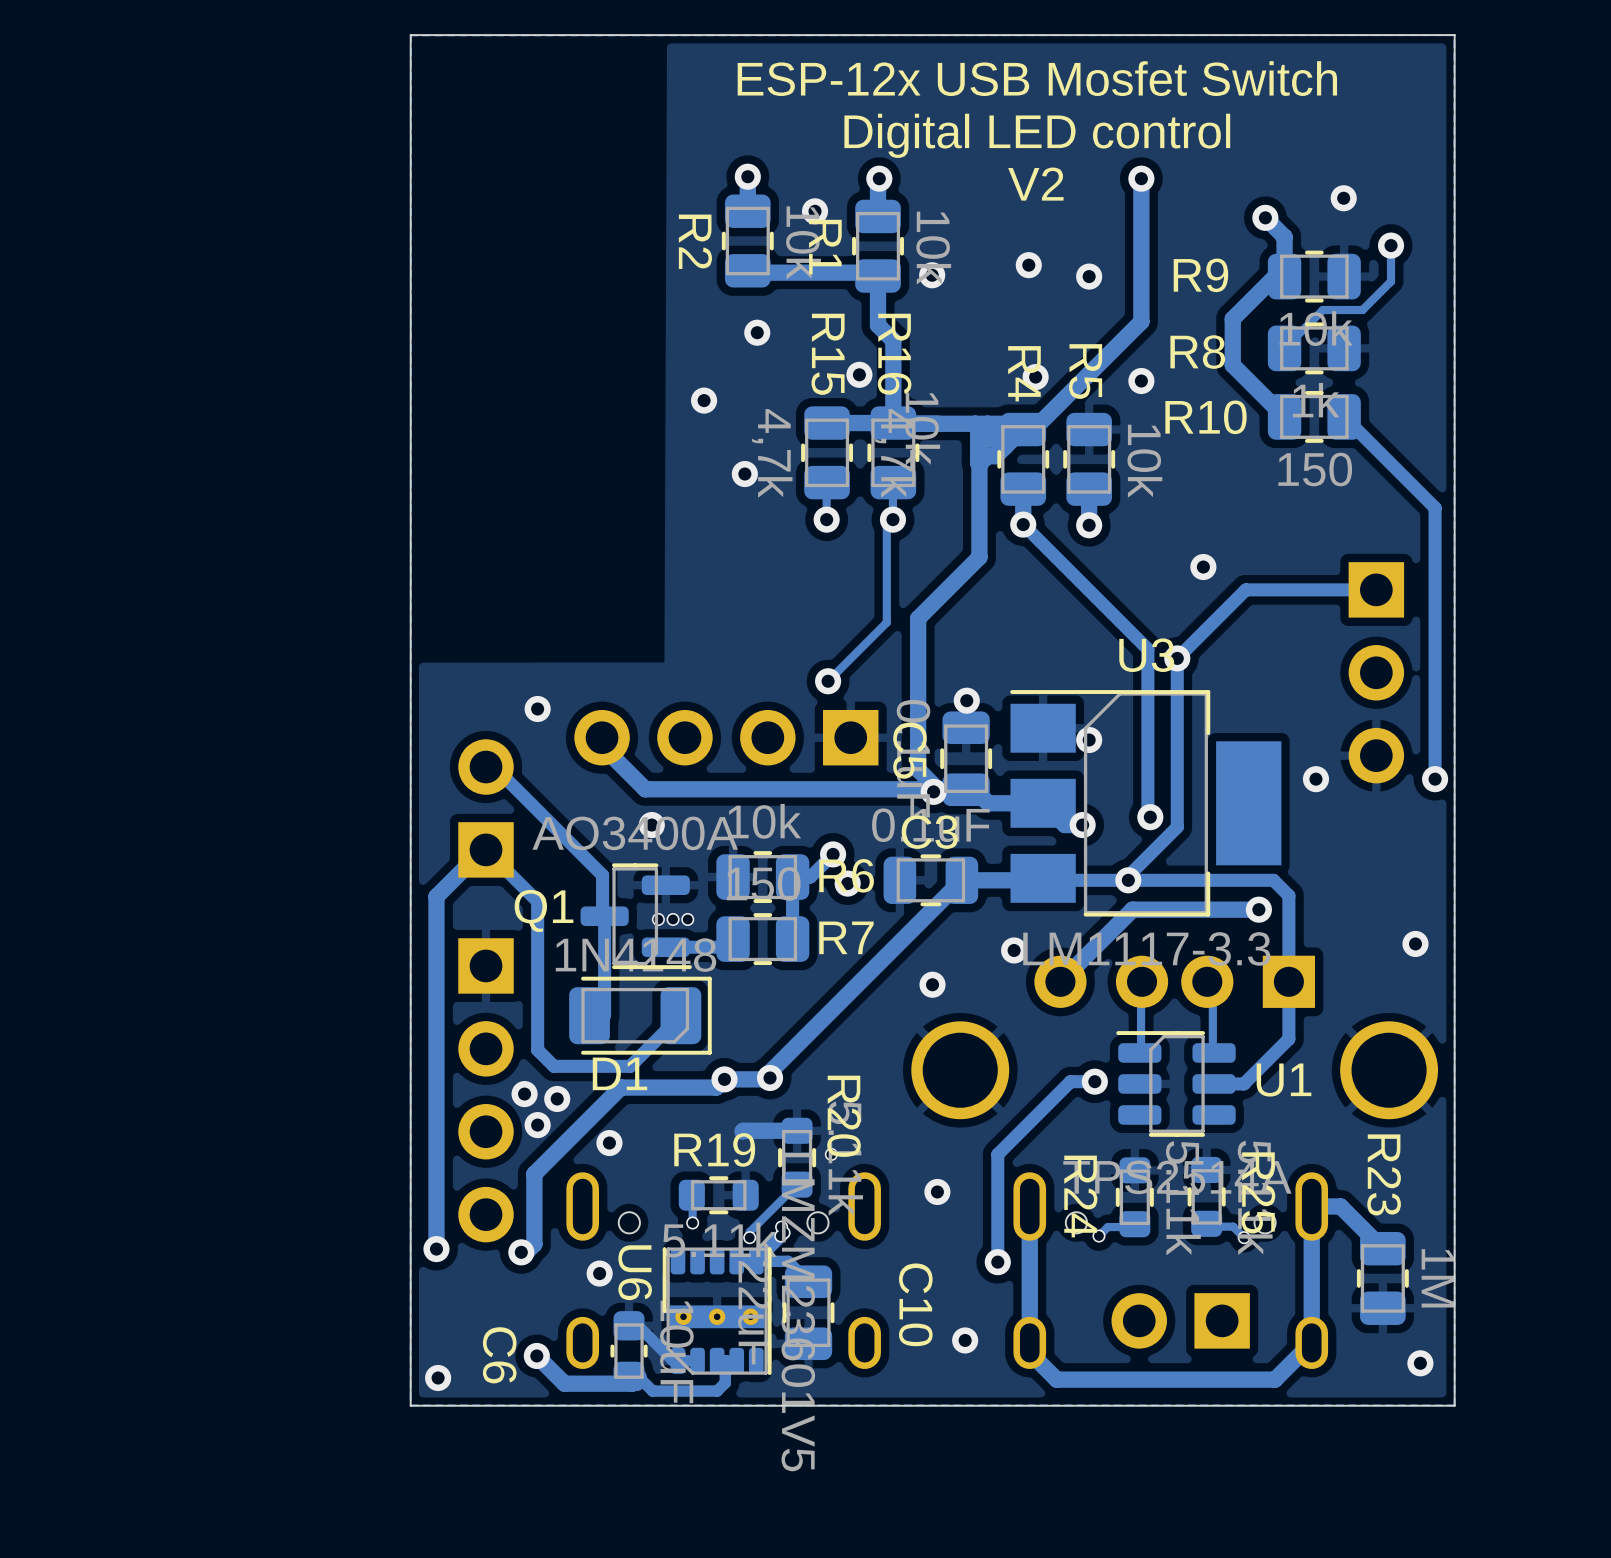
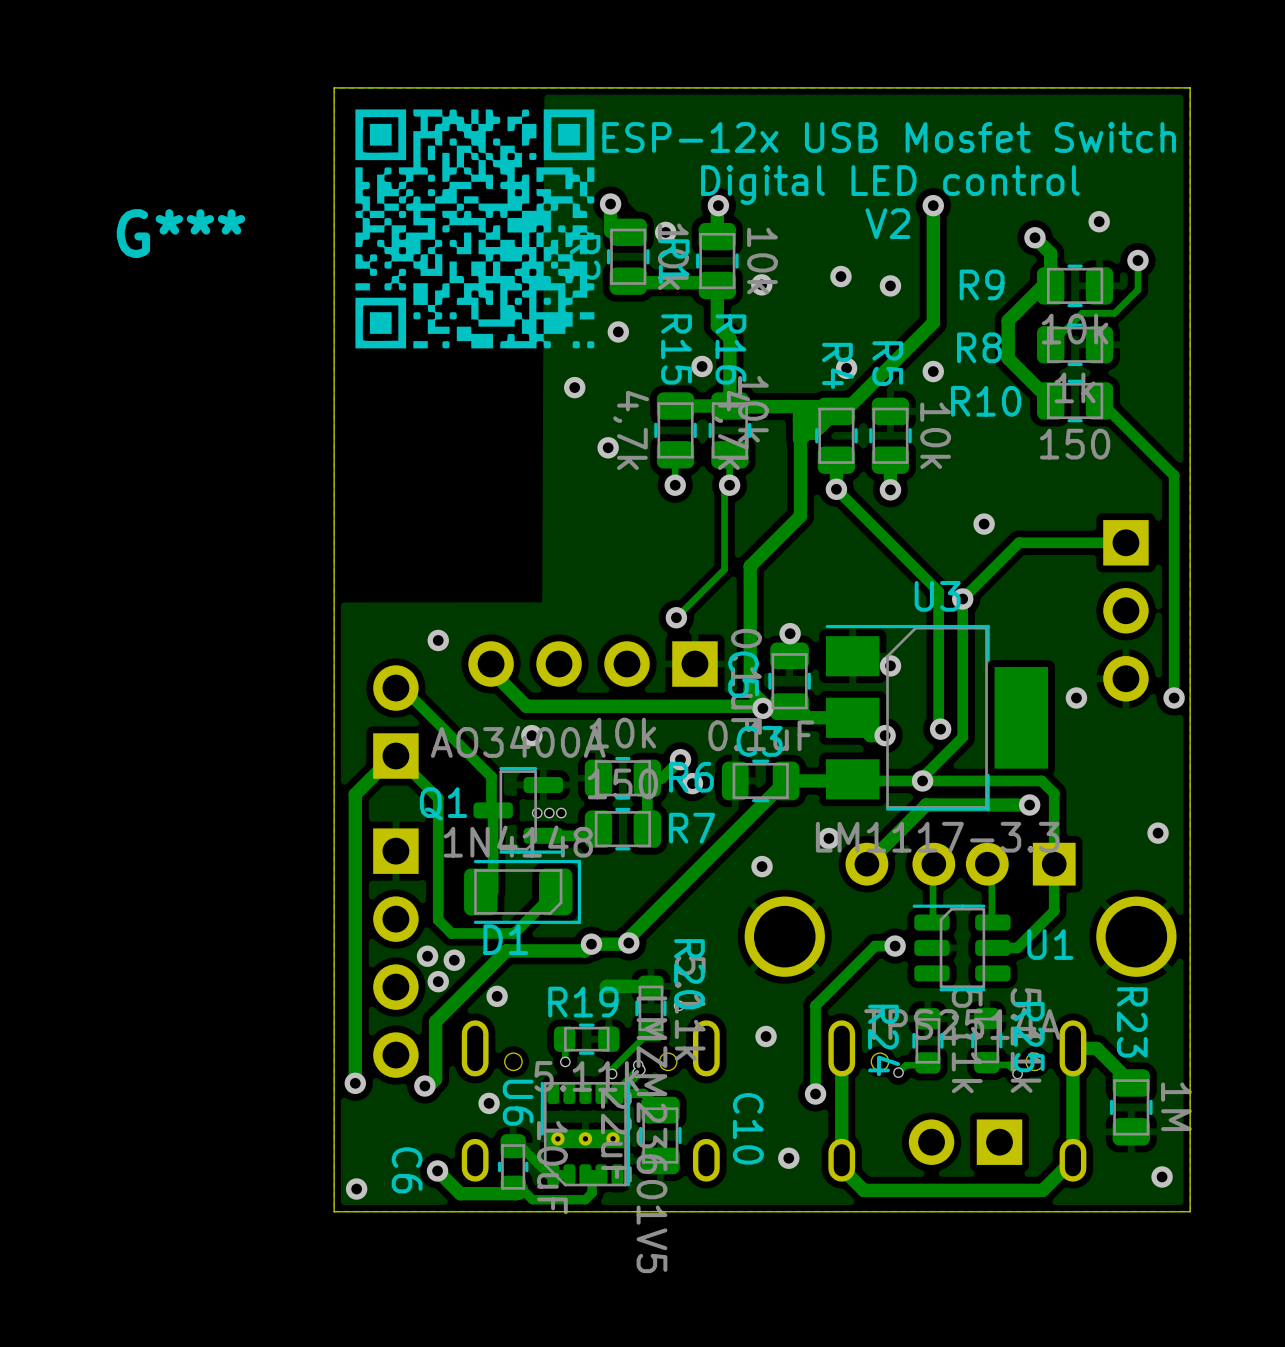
text position: ESP-12x USB Mosfet Switch (1037, 78) -> ESP-12x USB Mosfet Switch (889, 137)
text position: Digital LED control (1037, 135) -> Digital LED control (890, 185)
text position: V2 (1035, 184) -> V2 (887, 223)
G***: none -> (474, 228)
R2 position: (747, 241) -> (628, 256)

